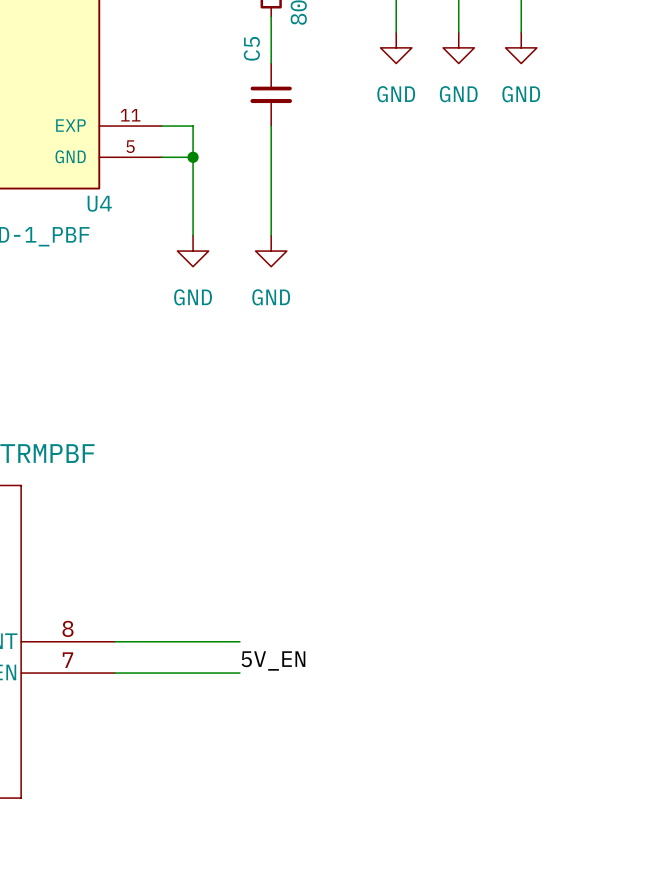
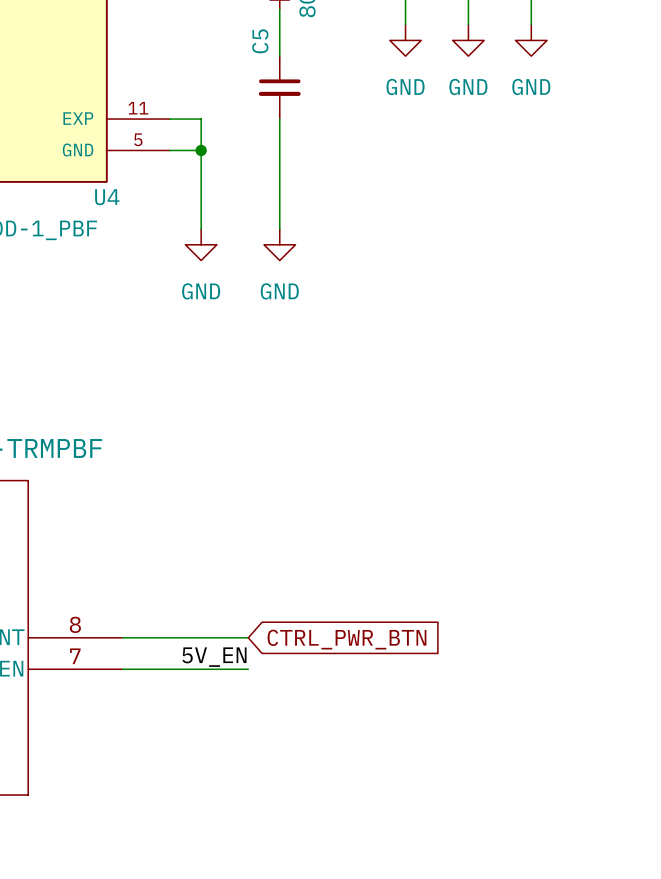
global label: none -> CTRL_PWR_BTN (346, 639)
label position: 5V_EN (273, 660) -> 5V_EN (214, 657)

